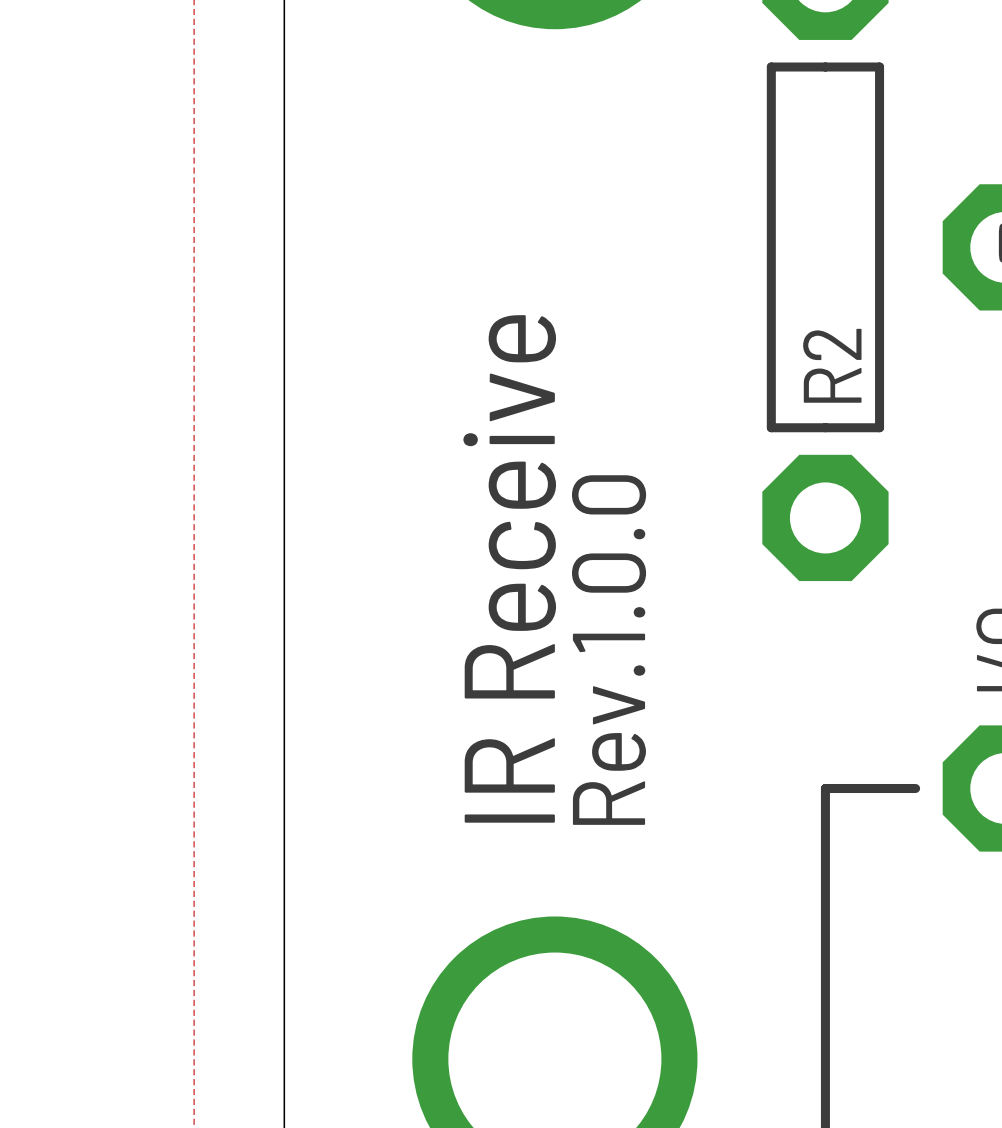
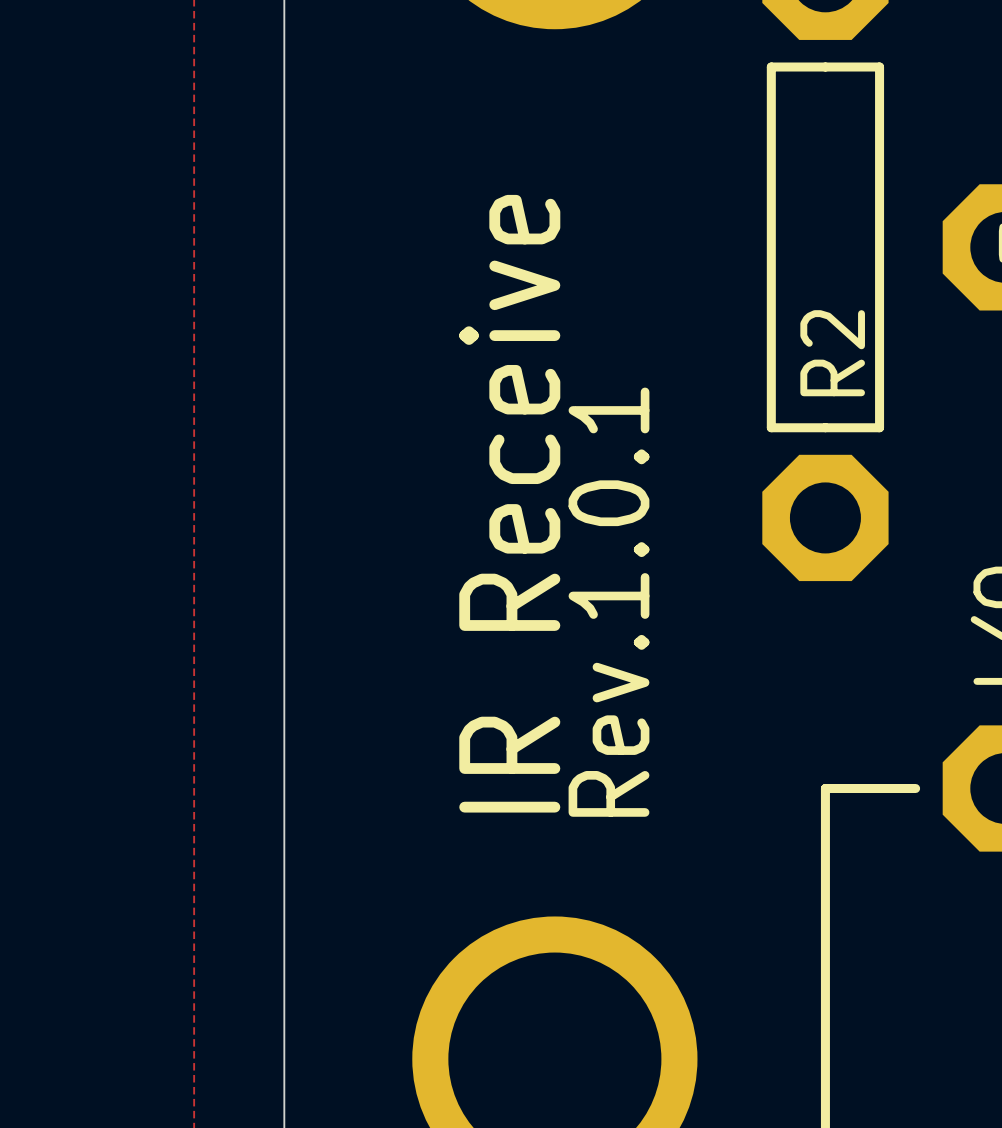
text: Rev.1.0.0 (609, 650) -> Rev.1.0.1 (608, 602)

